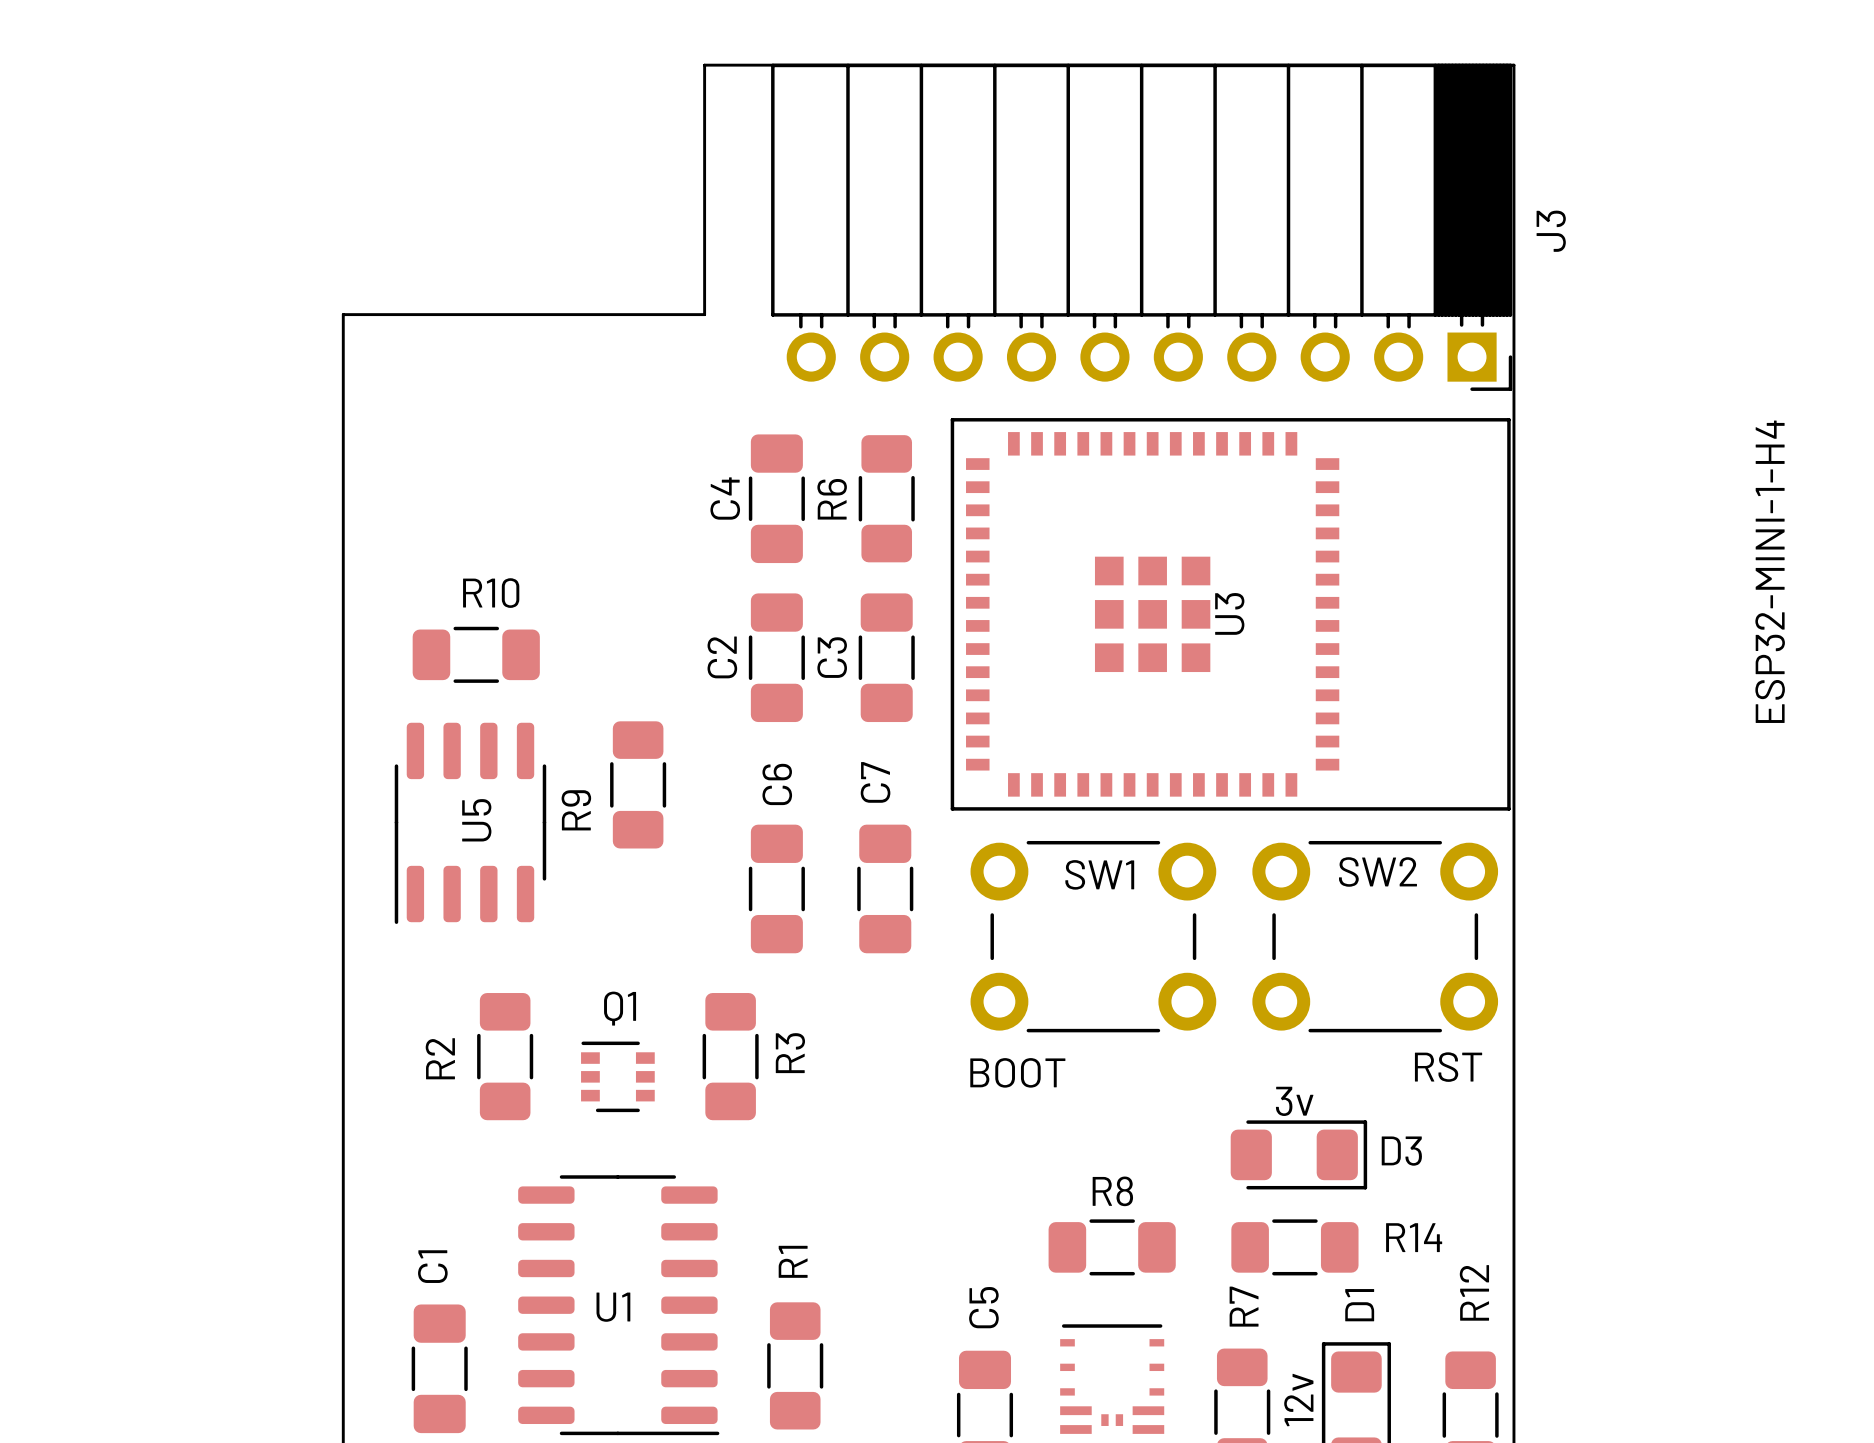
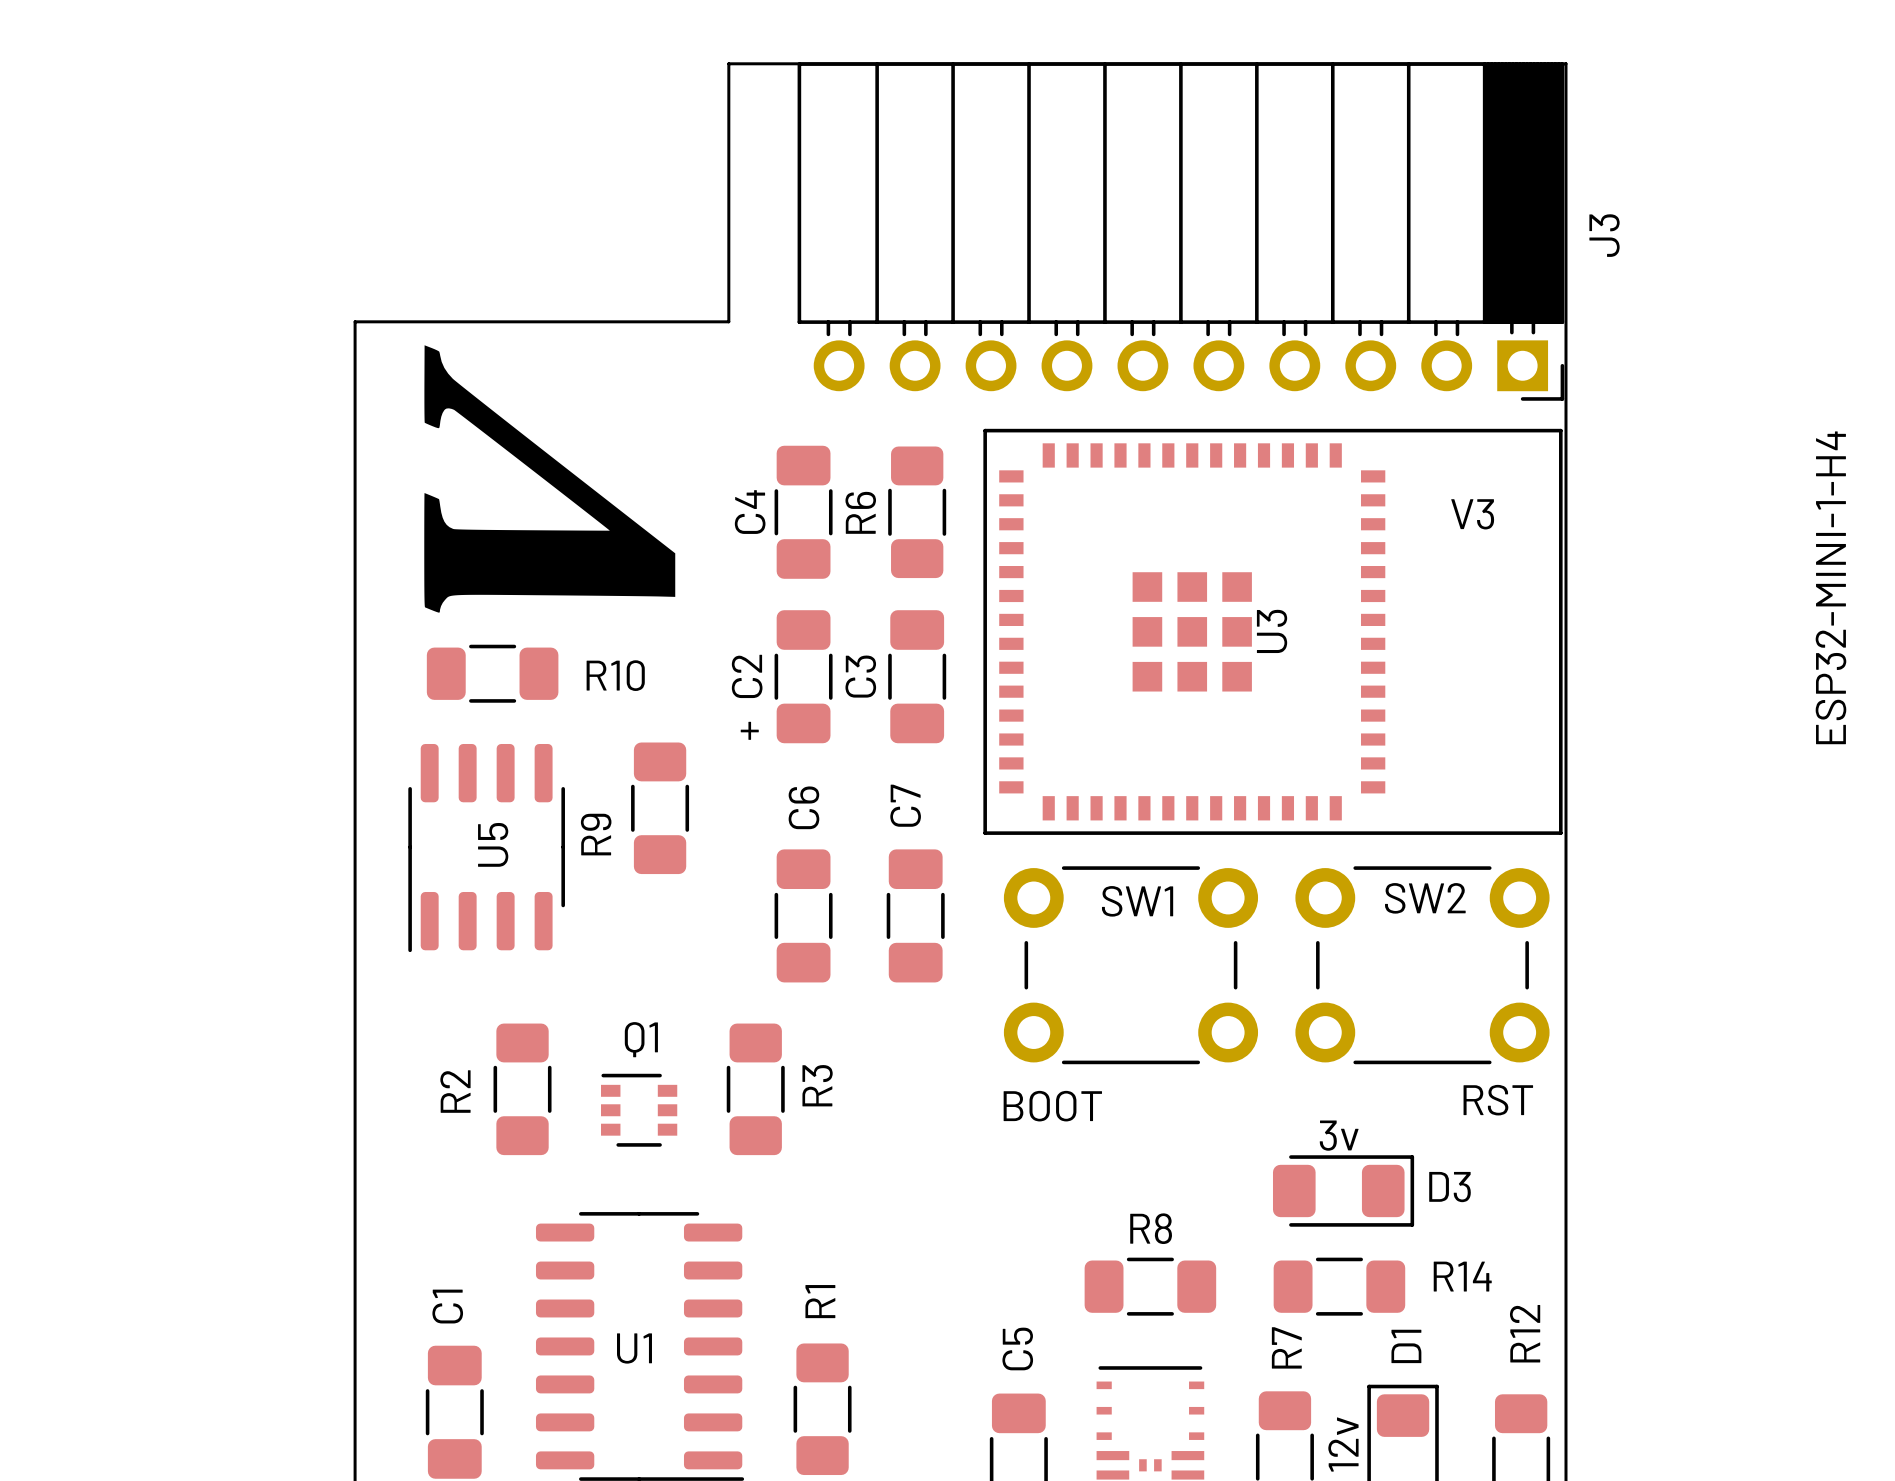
drawing: none -> [424, 345, 676, 613]
text: none -> V3 (1472, 514)
R10 name position: R10 (491, 593) -> R10 (615, 675)
text: none -> + (749, 730)

